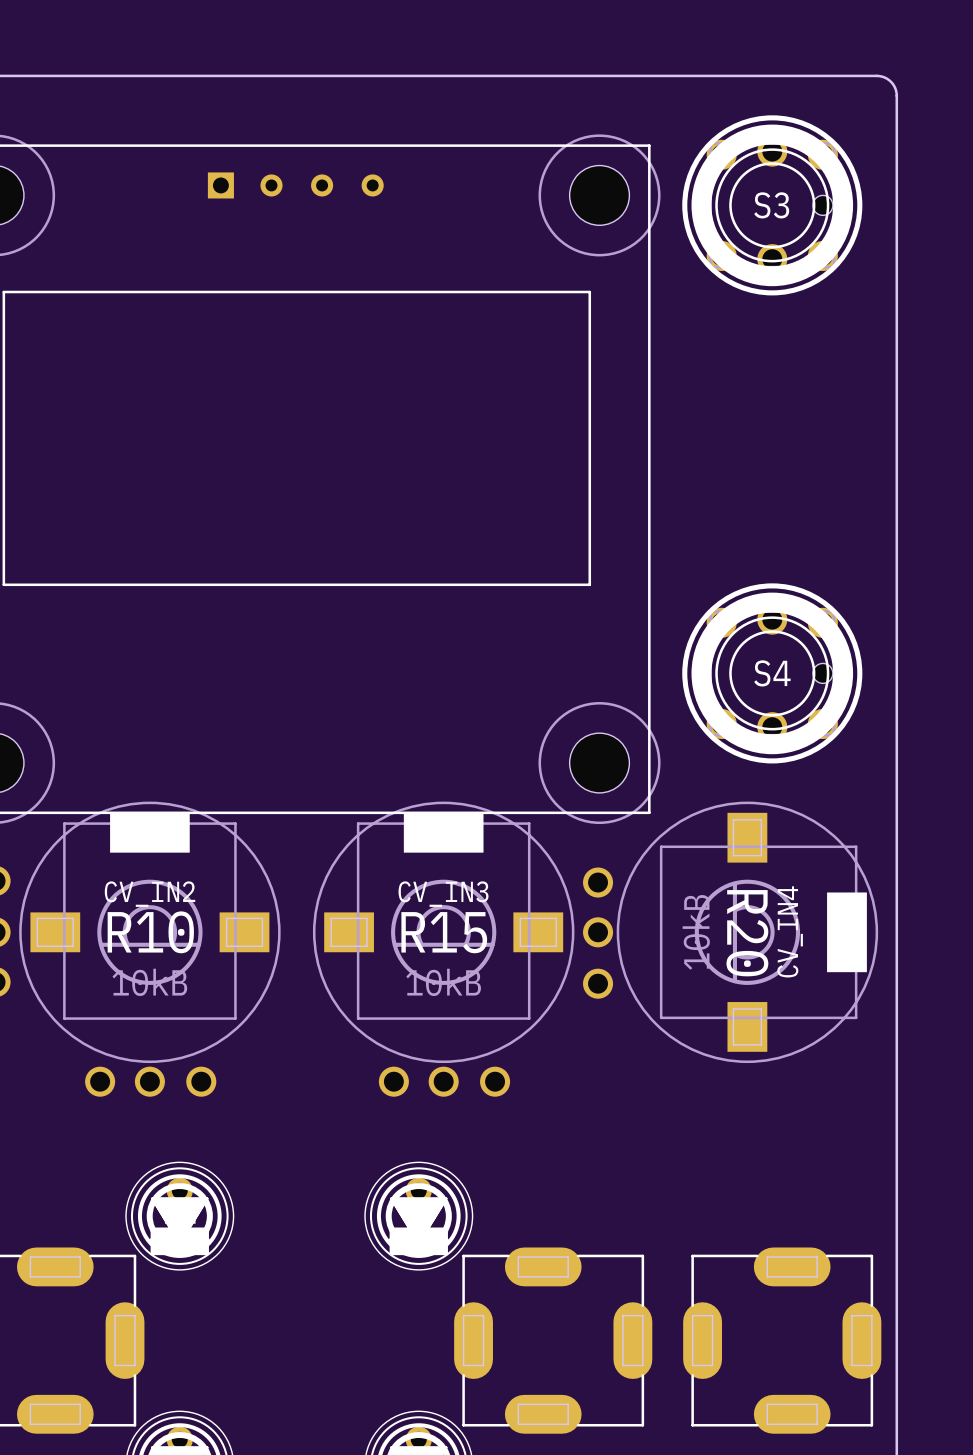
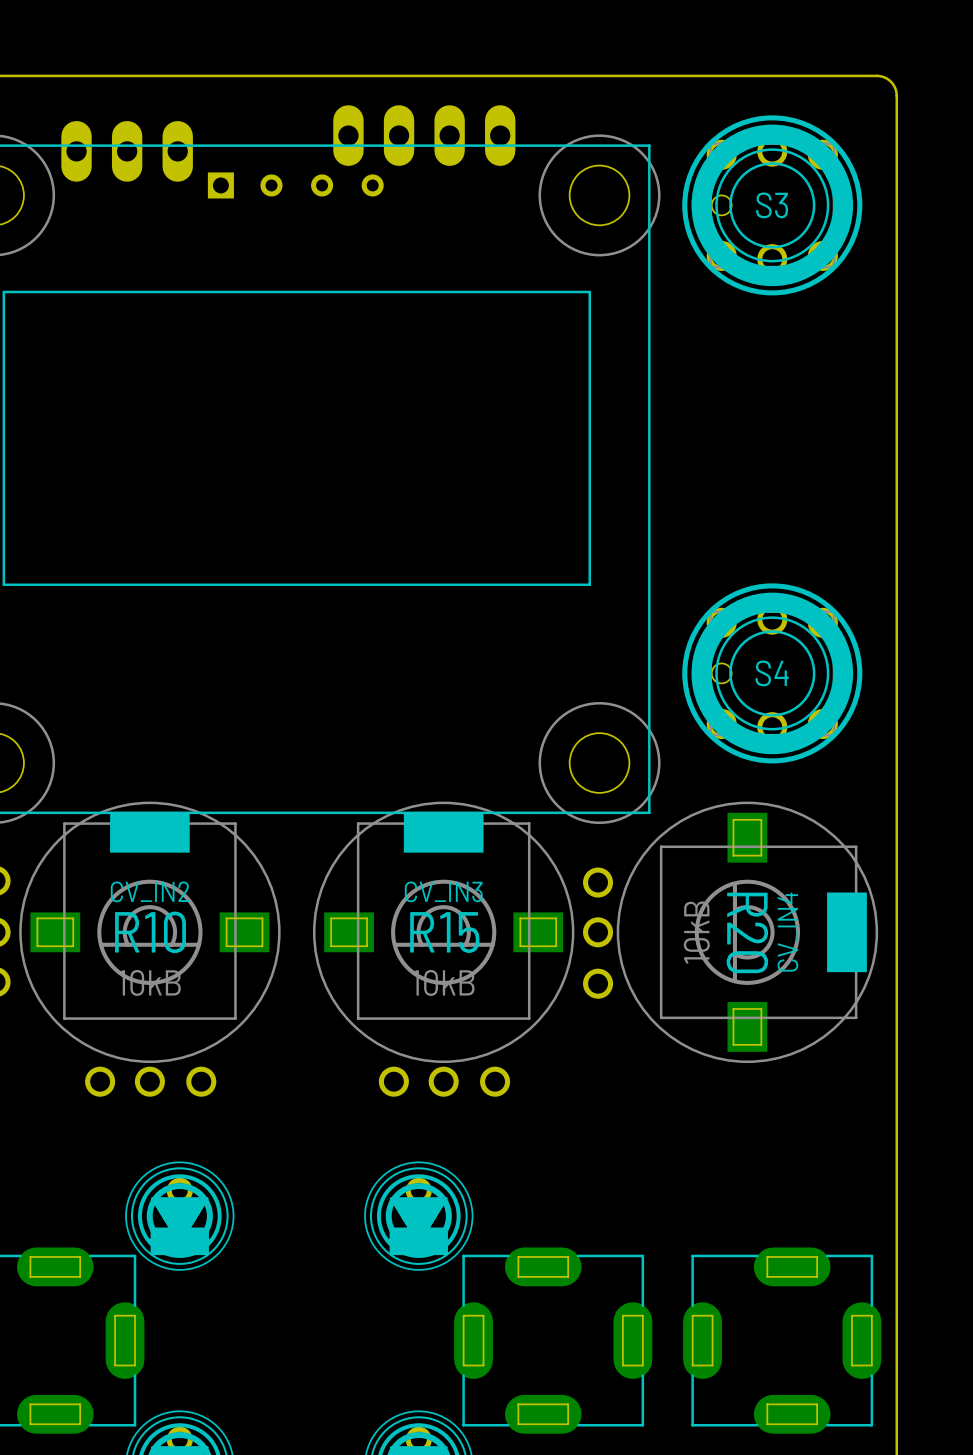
part: none -> (424, 135)
part: none -> (127, 151)
S3 rotation: 0° (772, 205) -> 180° (772, 205)
S4 rotation: 0° (772, 673) -> 180° (772, 673)

